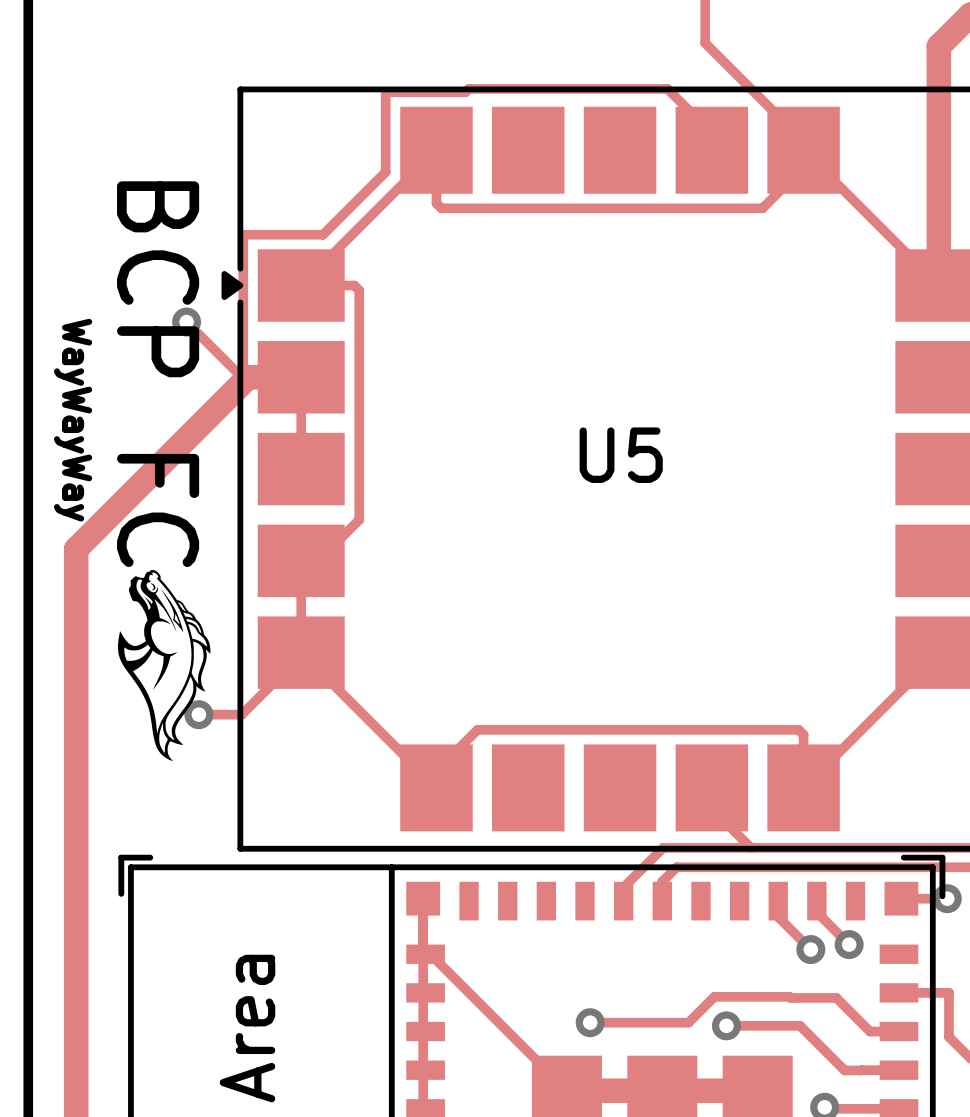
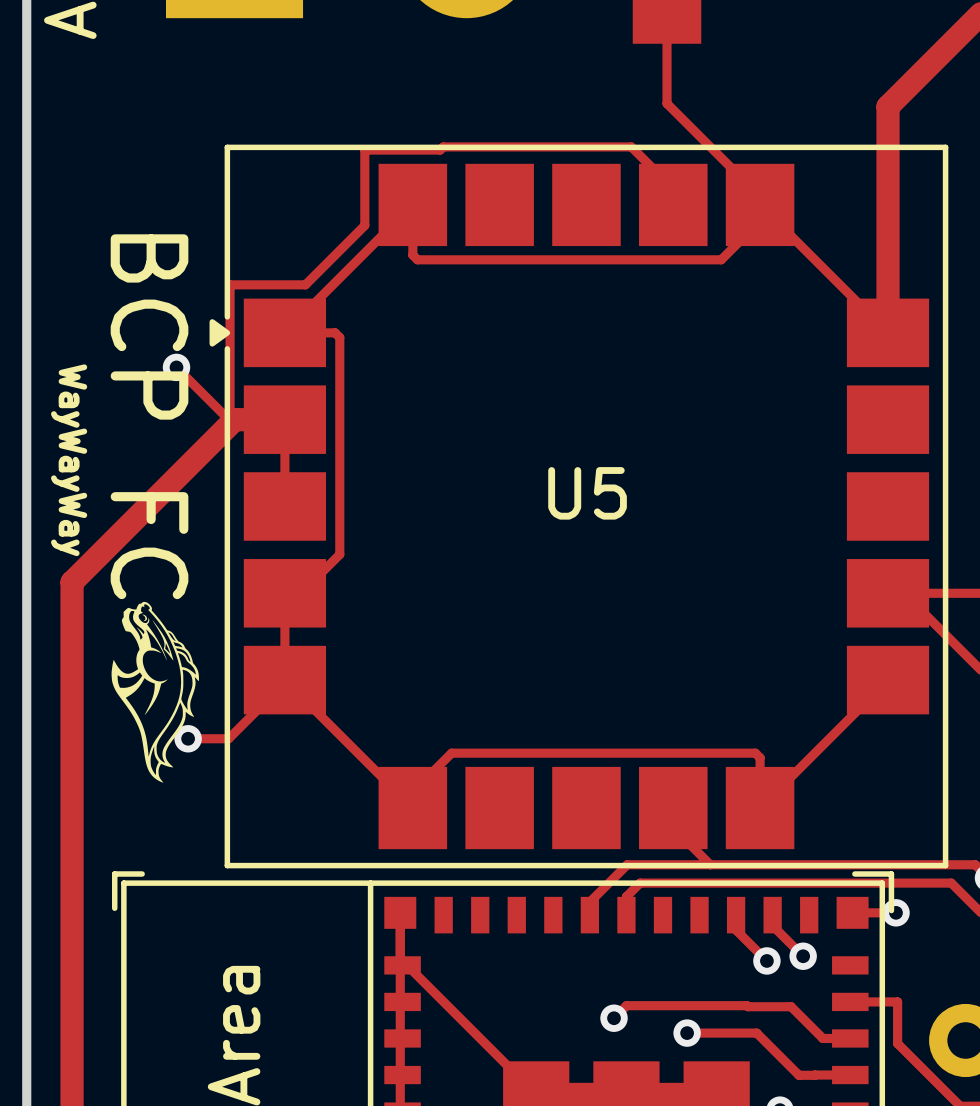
track: (714, 996) (688, 1022) (590, 1022) -> (675, 1005) (626, 1005) (614, 1018)
via position: (590, 1022) -> (614, 1018)

